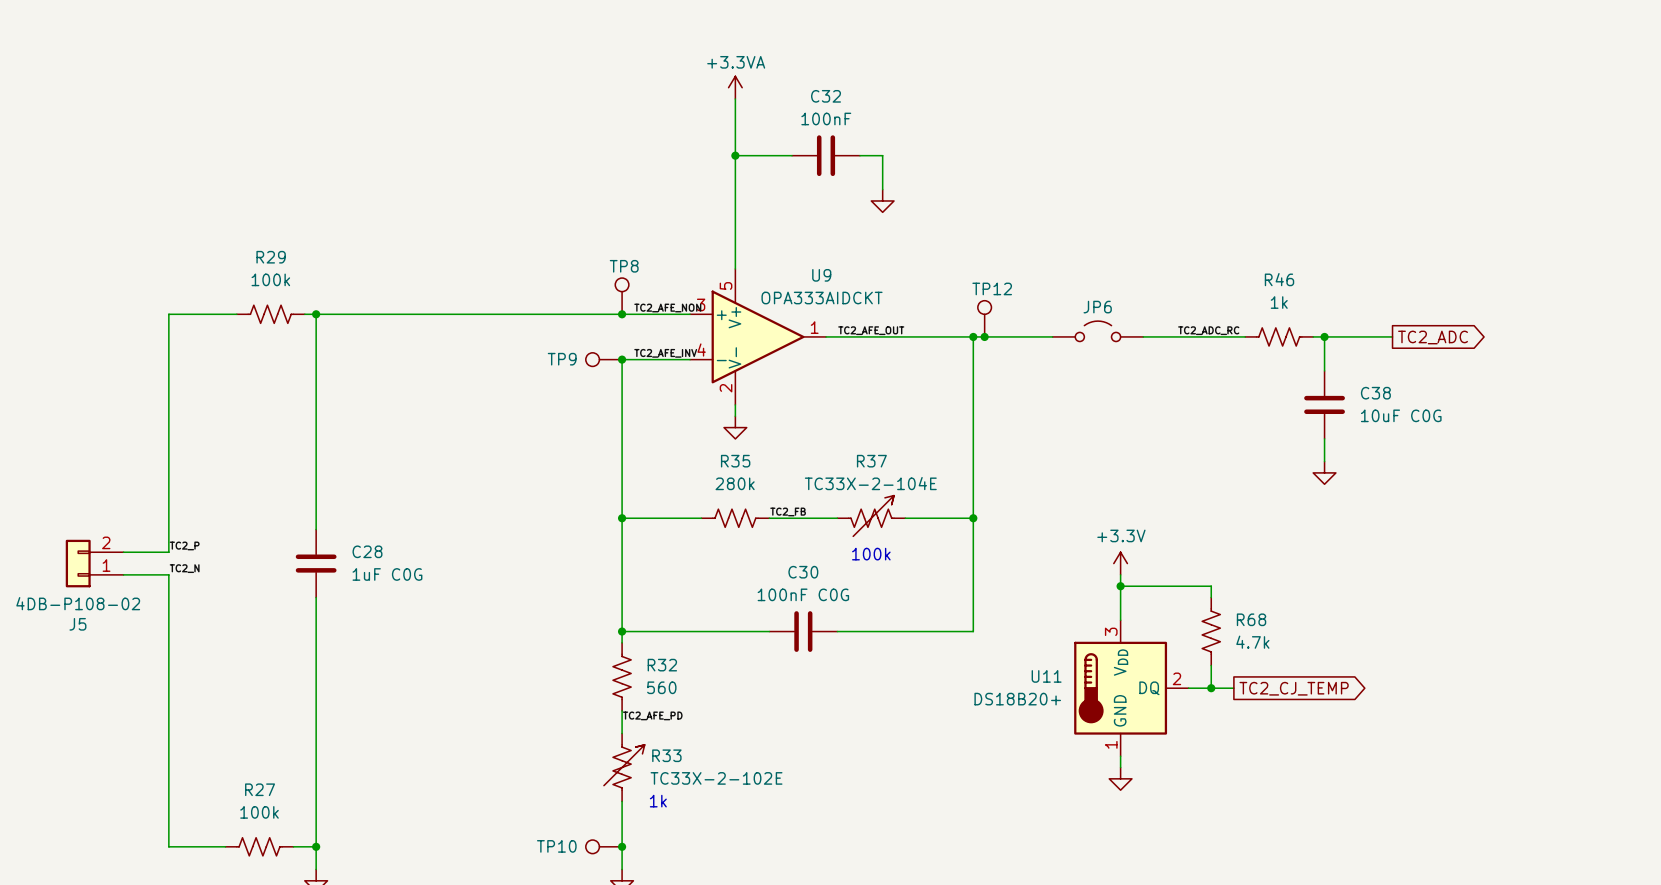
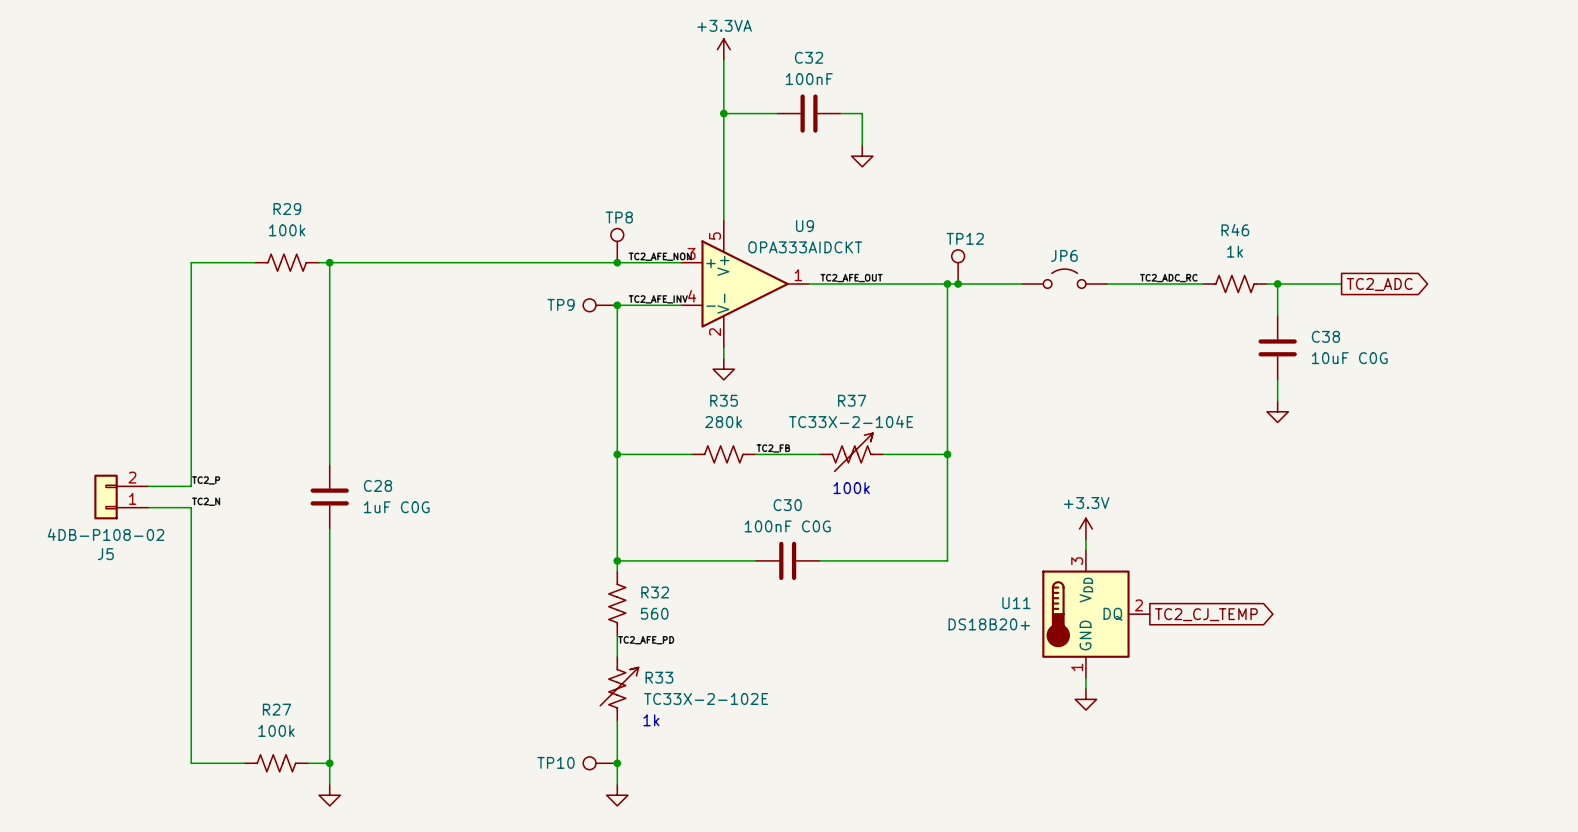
power symbol position: +3.3V (1120, 563) -> +3.3V (1085, 528)
wire: (1120, 586) (1211, 586) (1211, 597) -> none
junction: (1120, 586) -> none
R68: 4.7k (1211, 631) -> none
wire: (1211, 665) (1211, 688) -> none
wire: (1188, 688) (1233, 688) -> none
junction: (1211, 688) -> none
global label position: TC2_CJ_TEMP (1294, 688) -> TC2_CJ_TEMP (1206, 614)

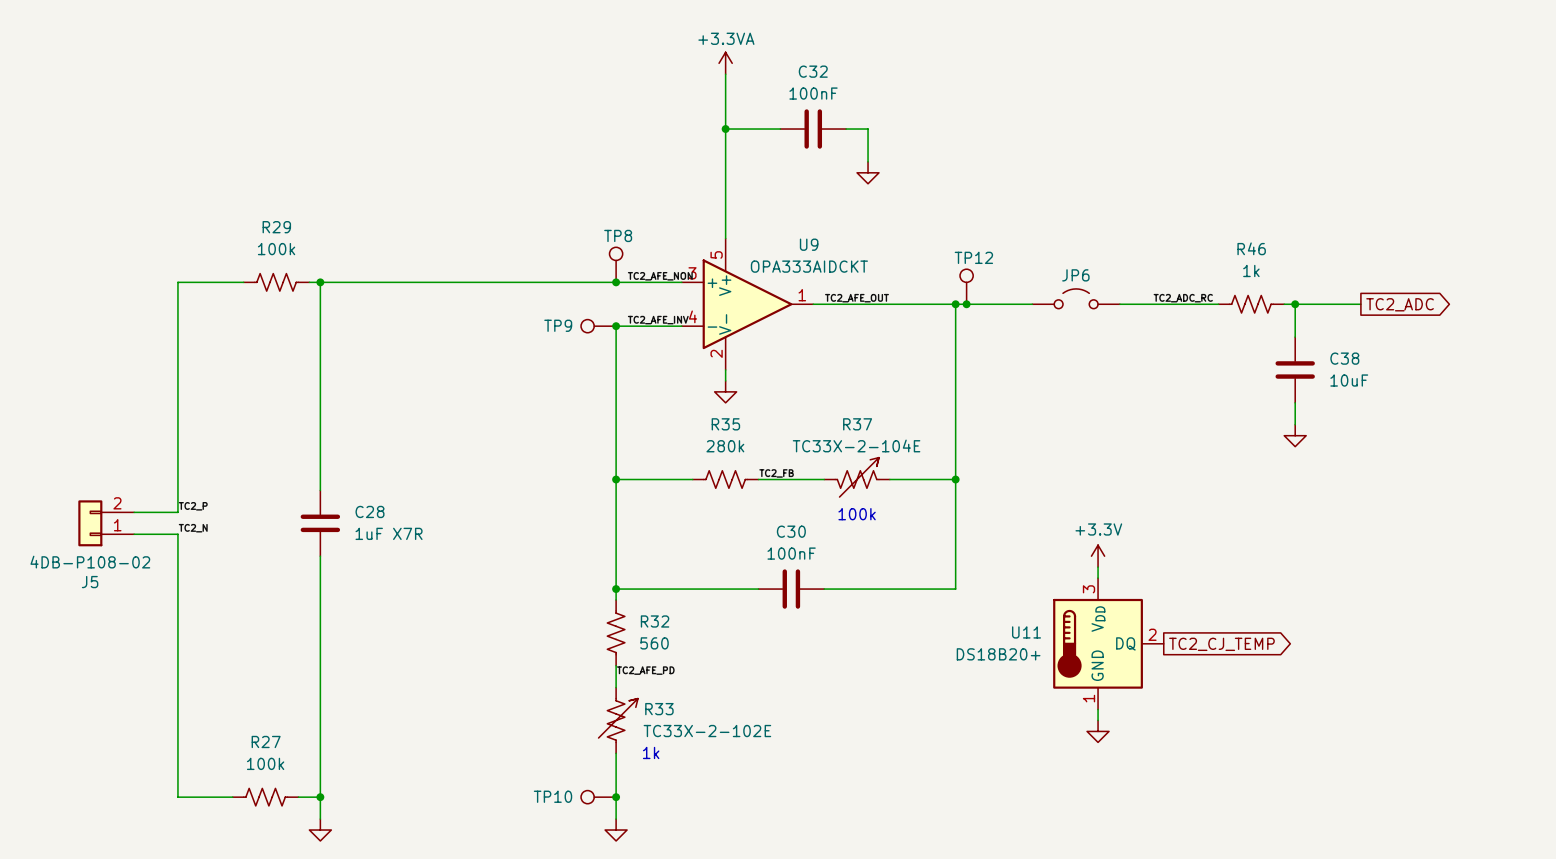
C38 value: 10uF C0G (1349, 358) -> 10uF (1349, 380)
C28 value: 1uF C0G (396, 507) -> 1uF X7R (389, 533)
C30 value: 100nF C0G (787, 526) -> 100nF (791, 553)

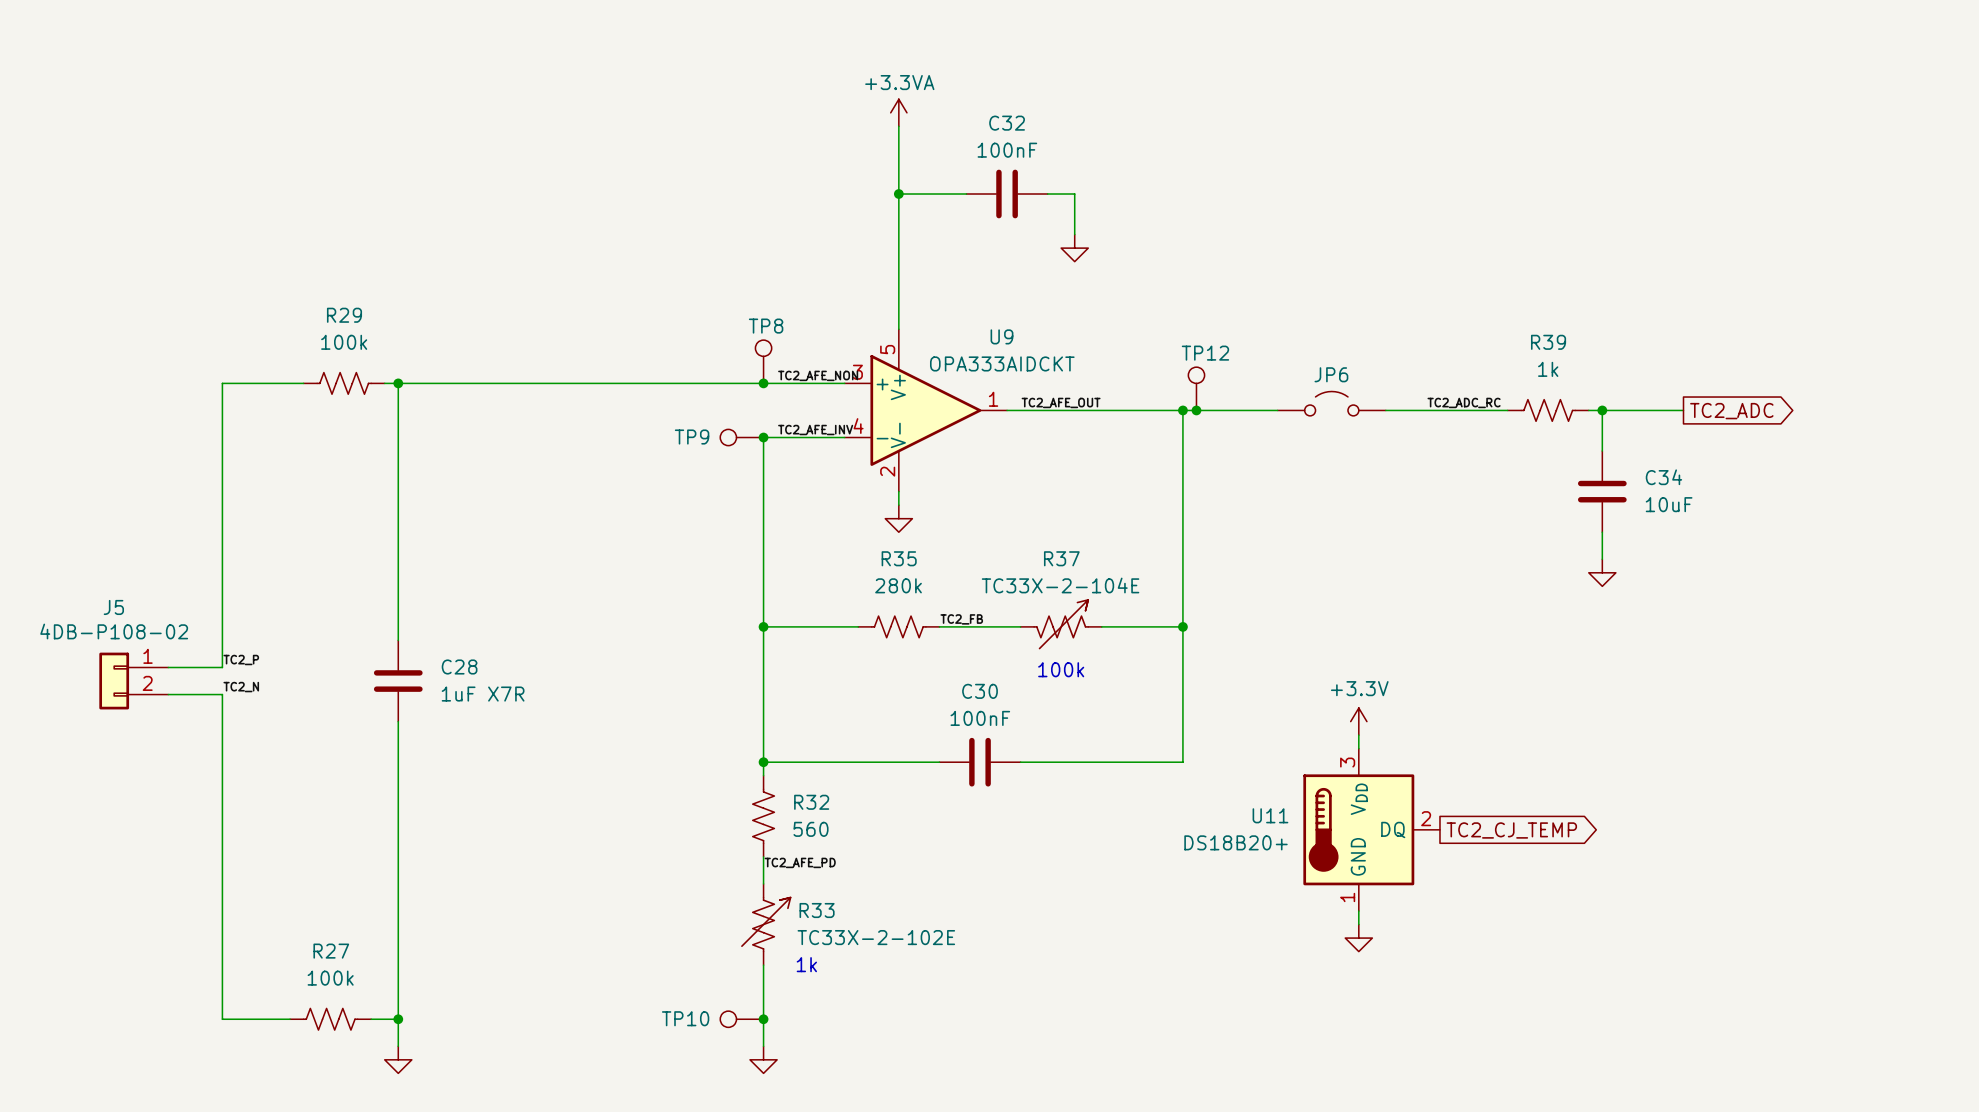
R46 name: R46 (1251, 248) -> R39 (1548, 342)
C38 name: C38 (1344, 358) -> C34 (1663, 477)
J5 flip: as is (90, 523) -> up-down (114, 681)

